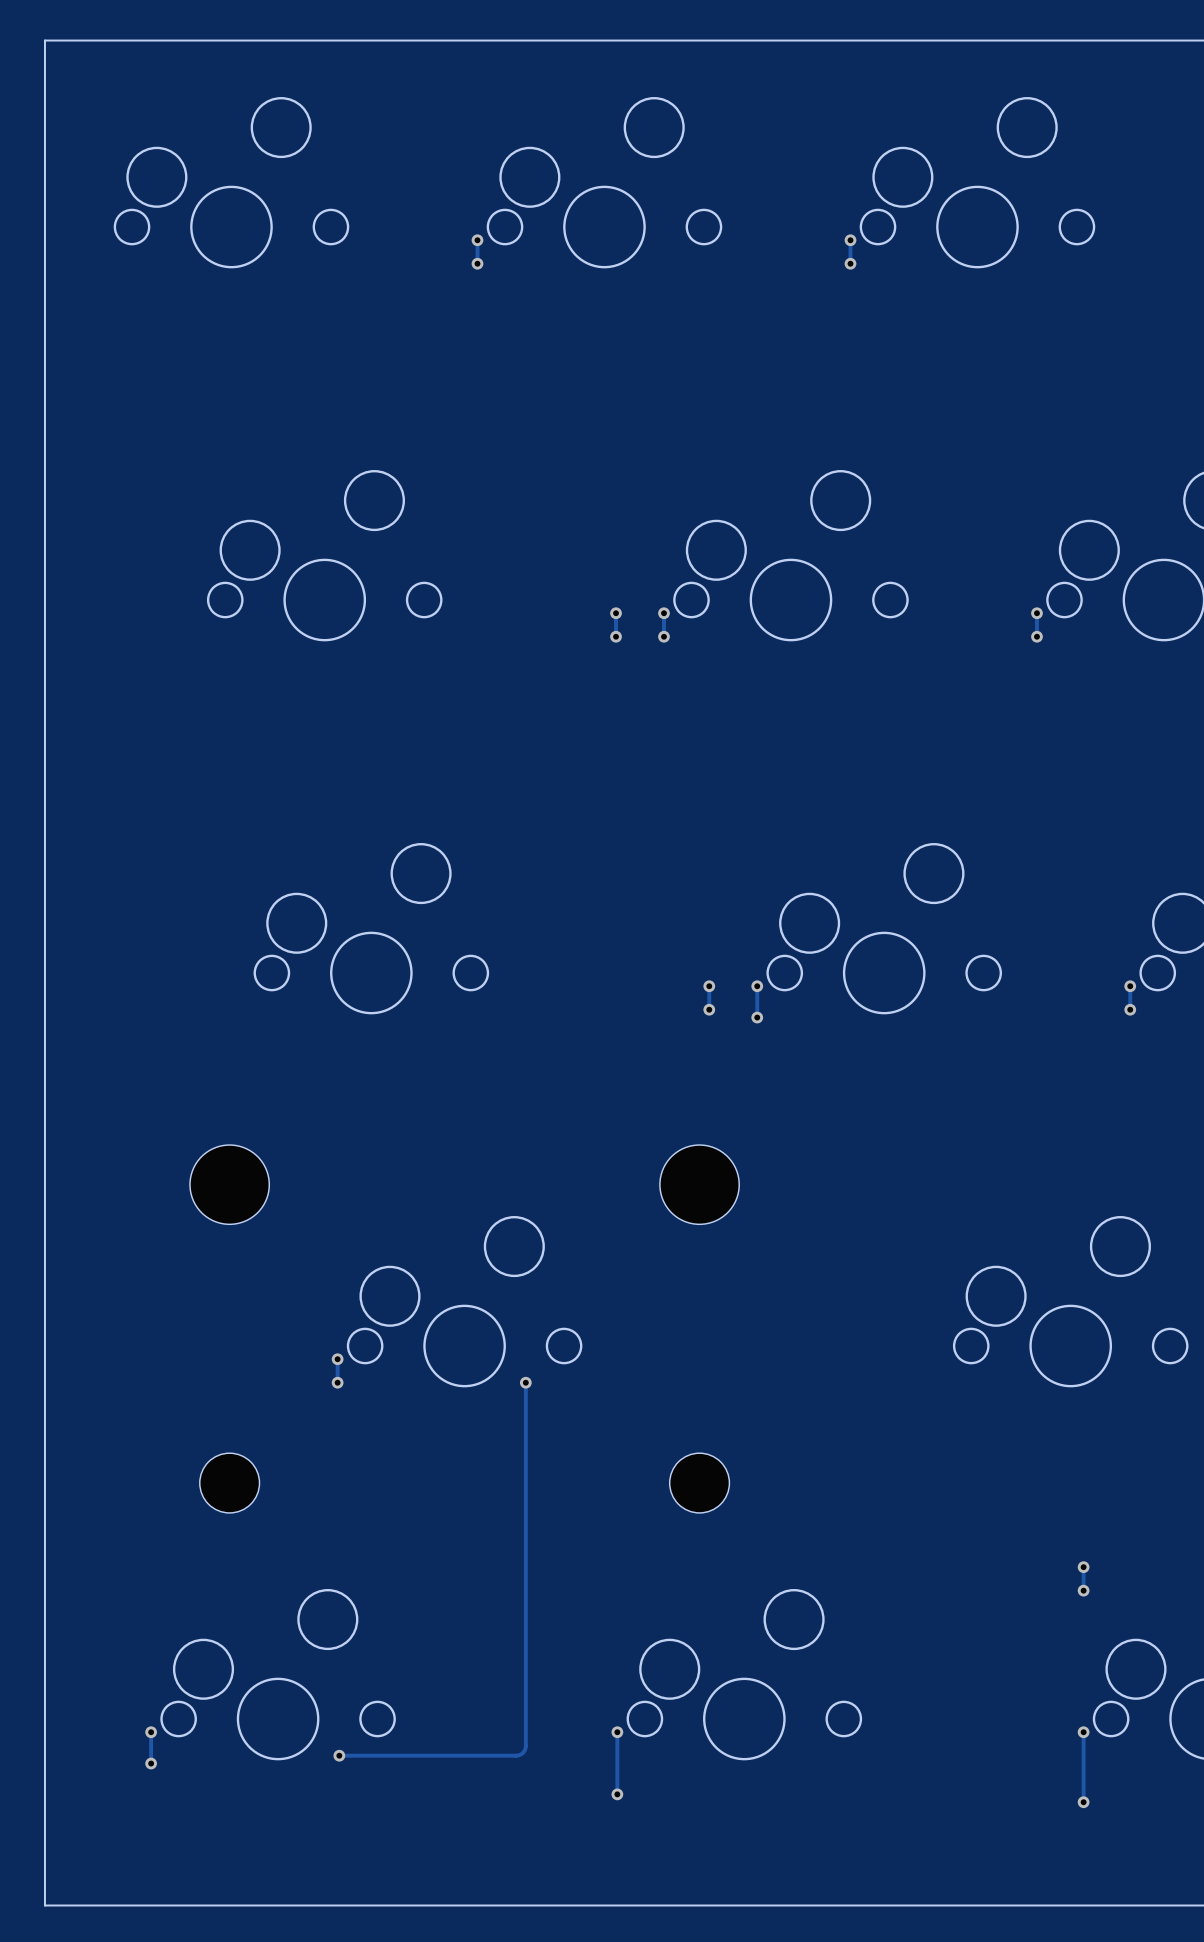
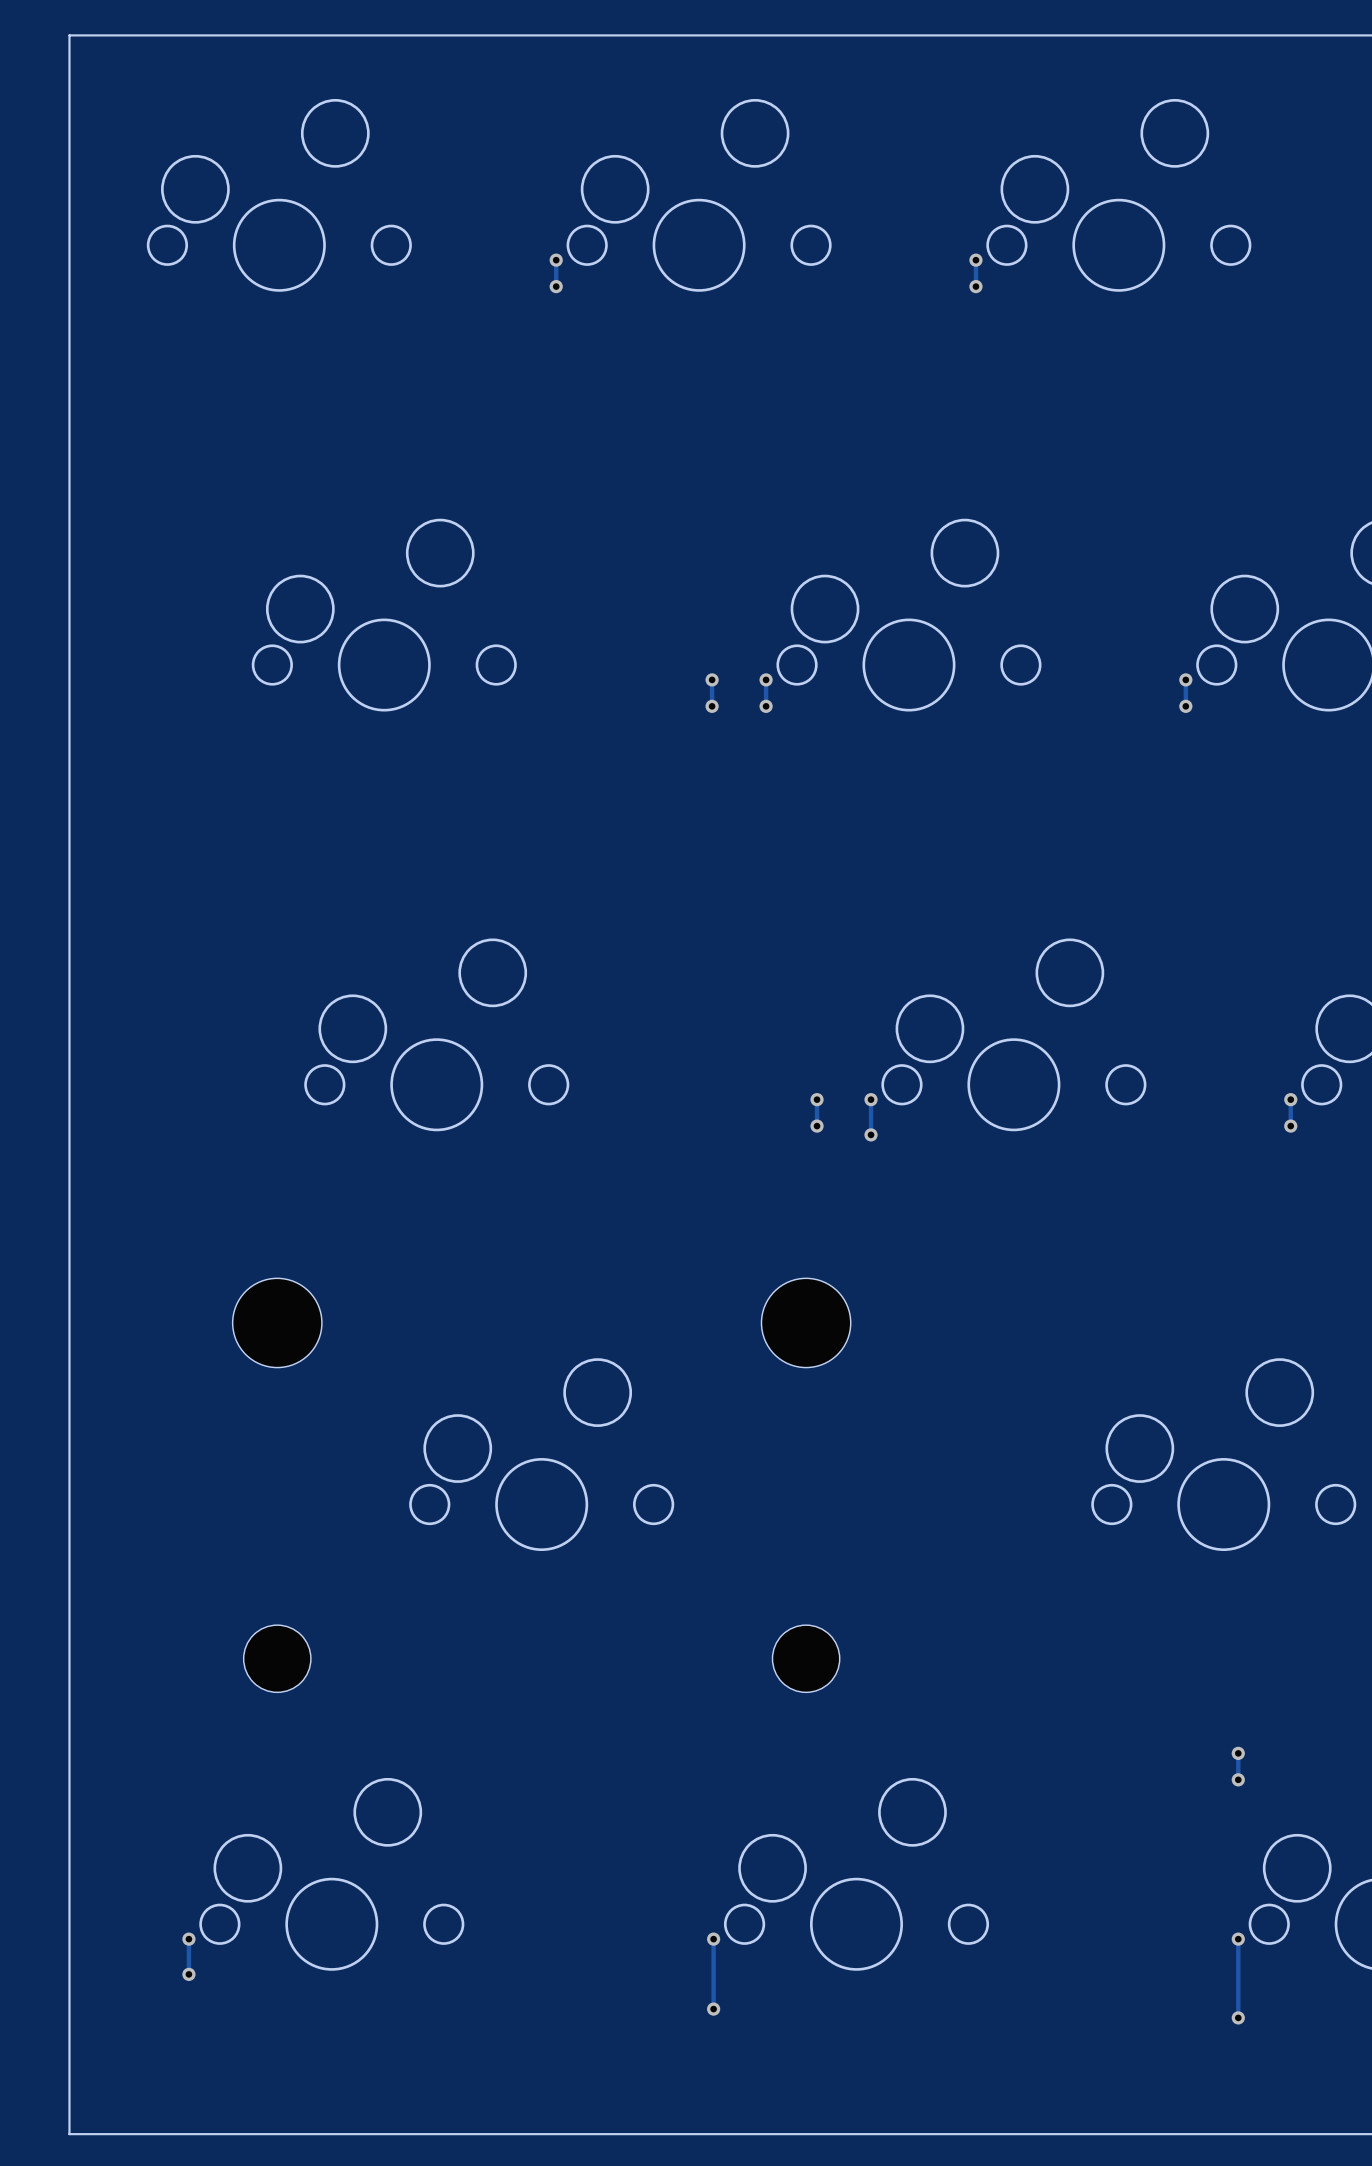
track: (337, 1359) (337, 1382) -> none
via: (337, 1359) -> none
via: (337, 1382) -> none
track: (525, 1382) (524, 1750) (516, 1755) (339, 1755) -> none
via: (525, 1382) -> none
via: (339, 1755) -> none

